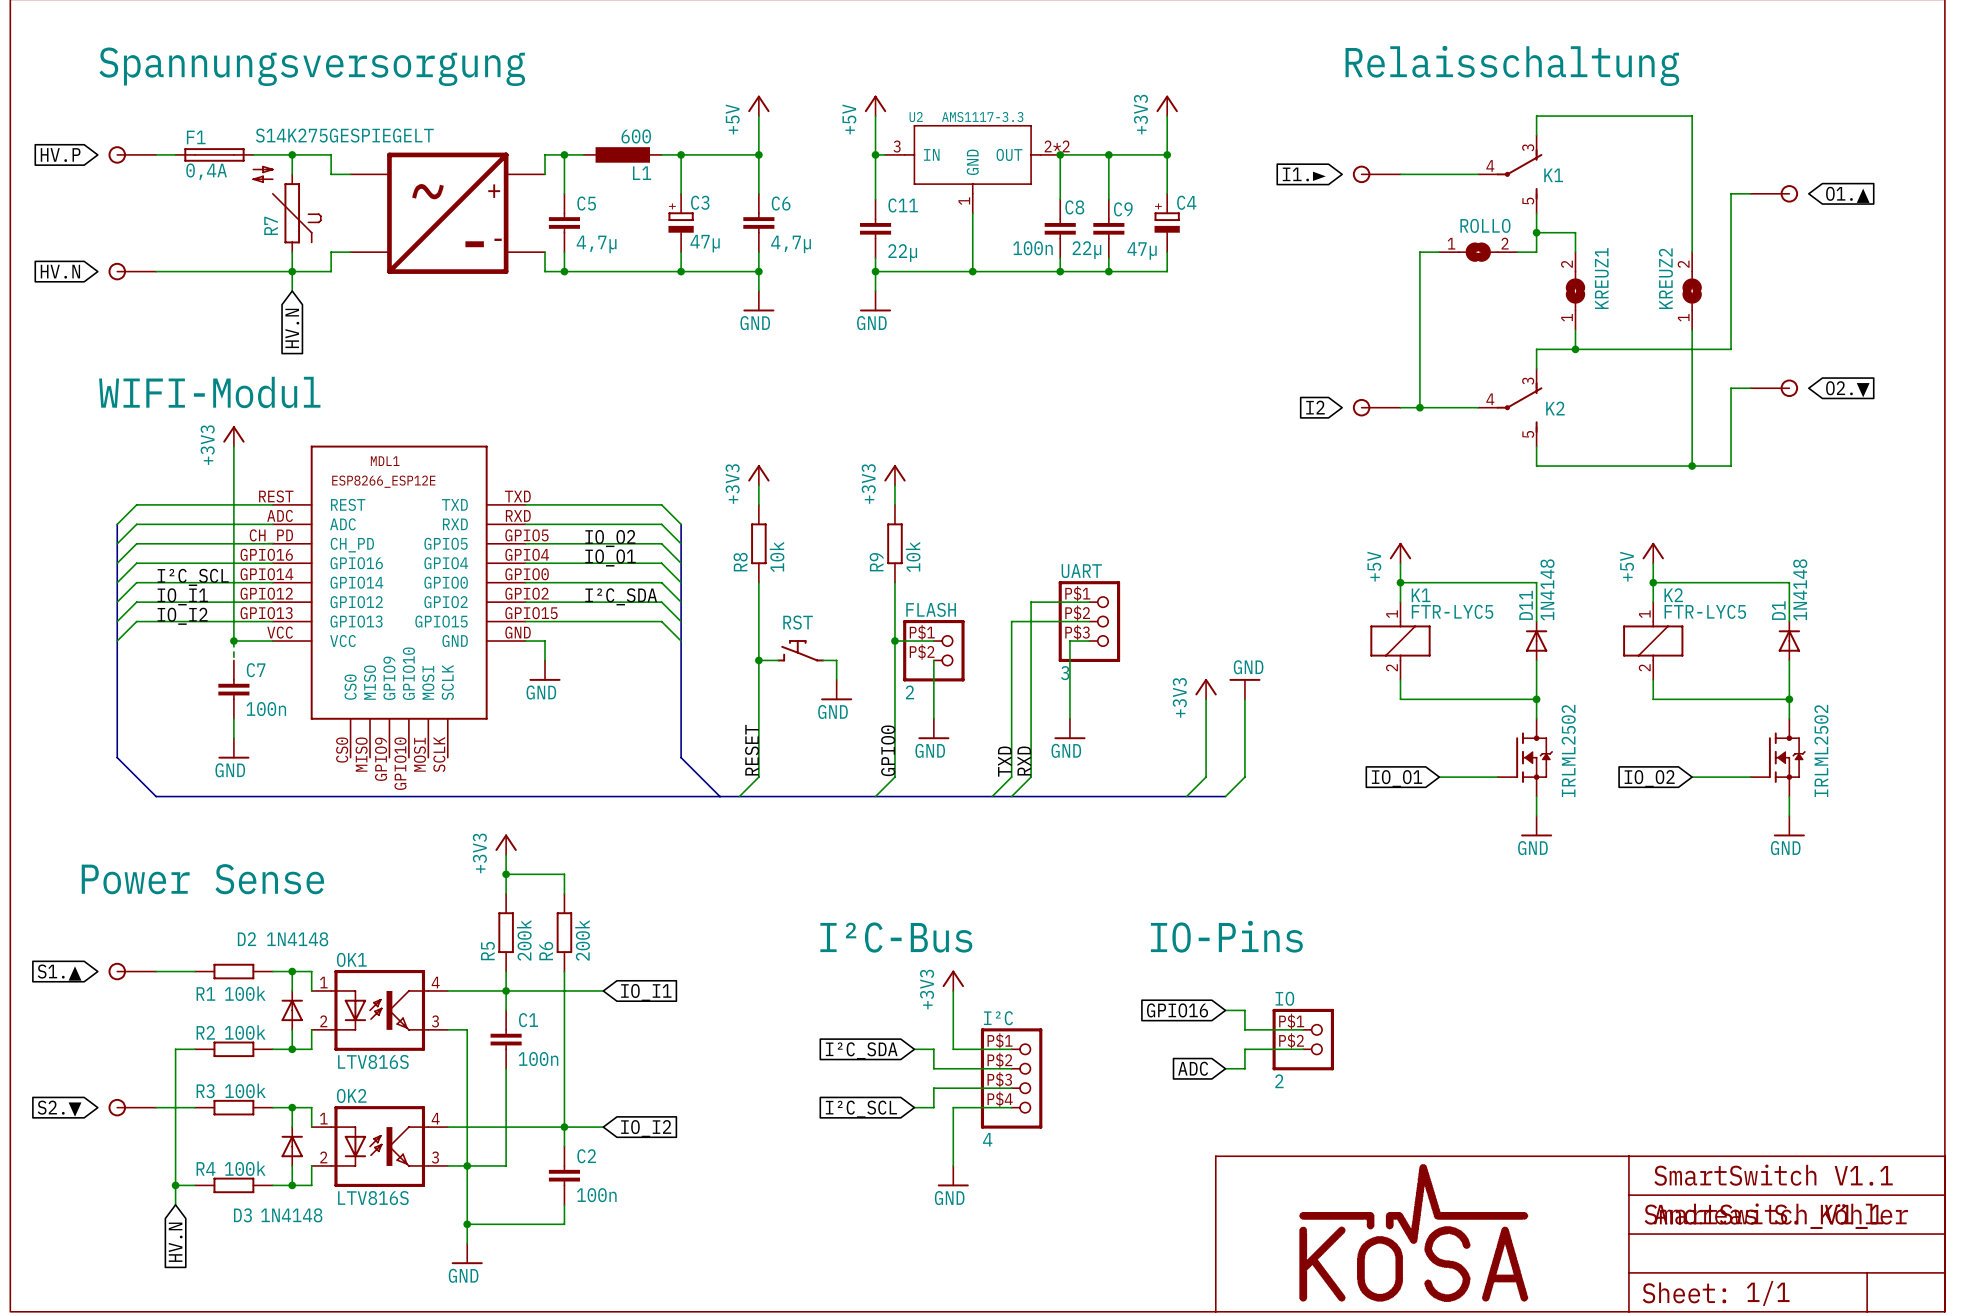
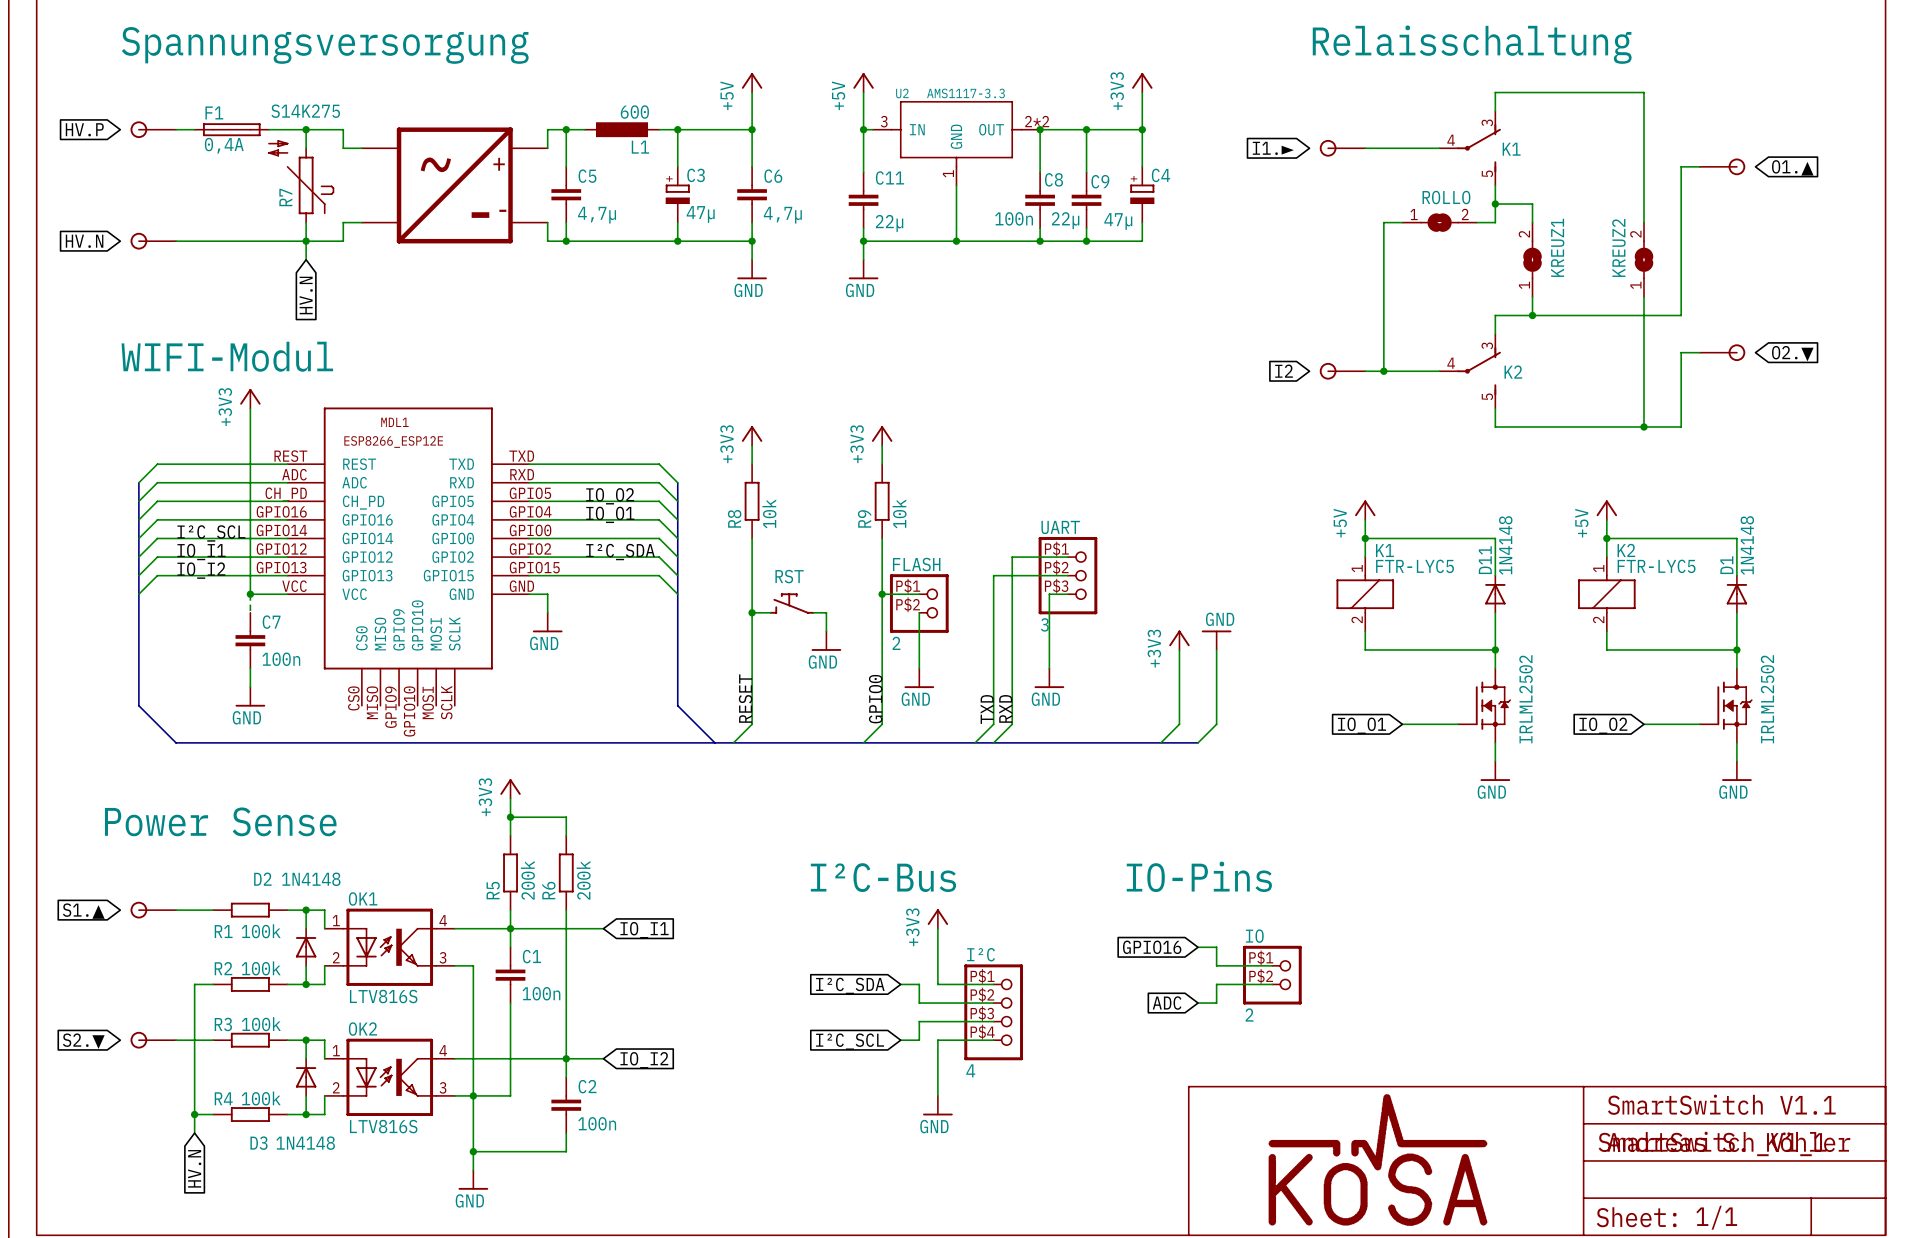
R7 value: S14K275GESPIEGELT (344, 135) -> S14K275 (305, 111)

